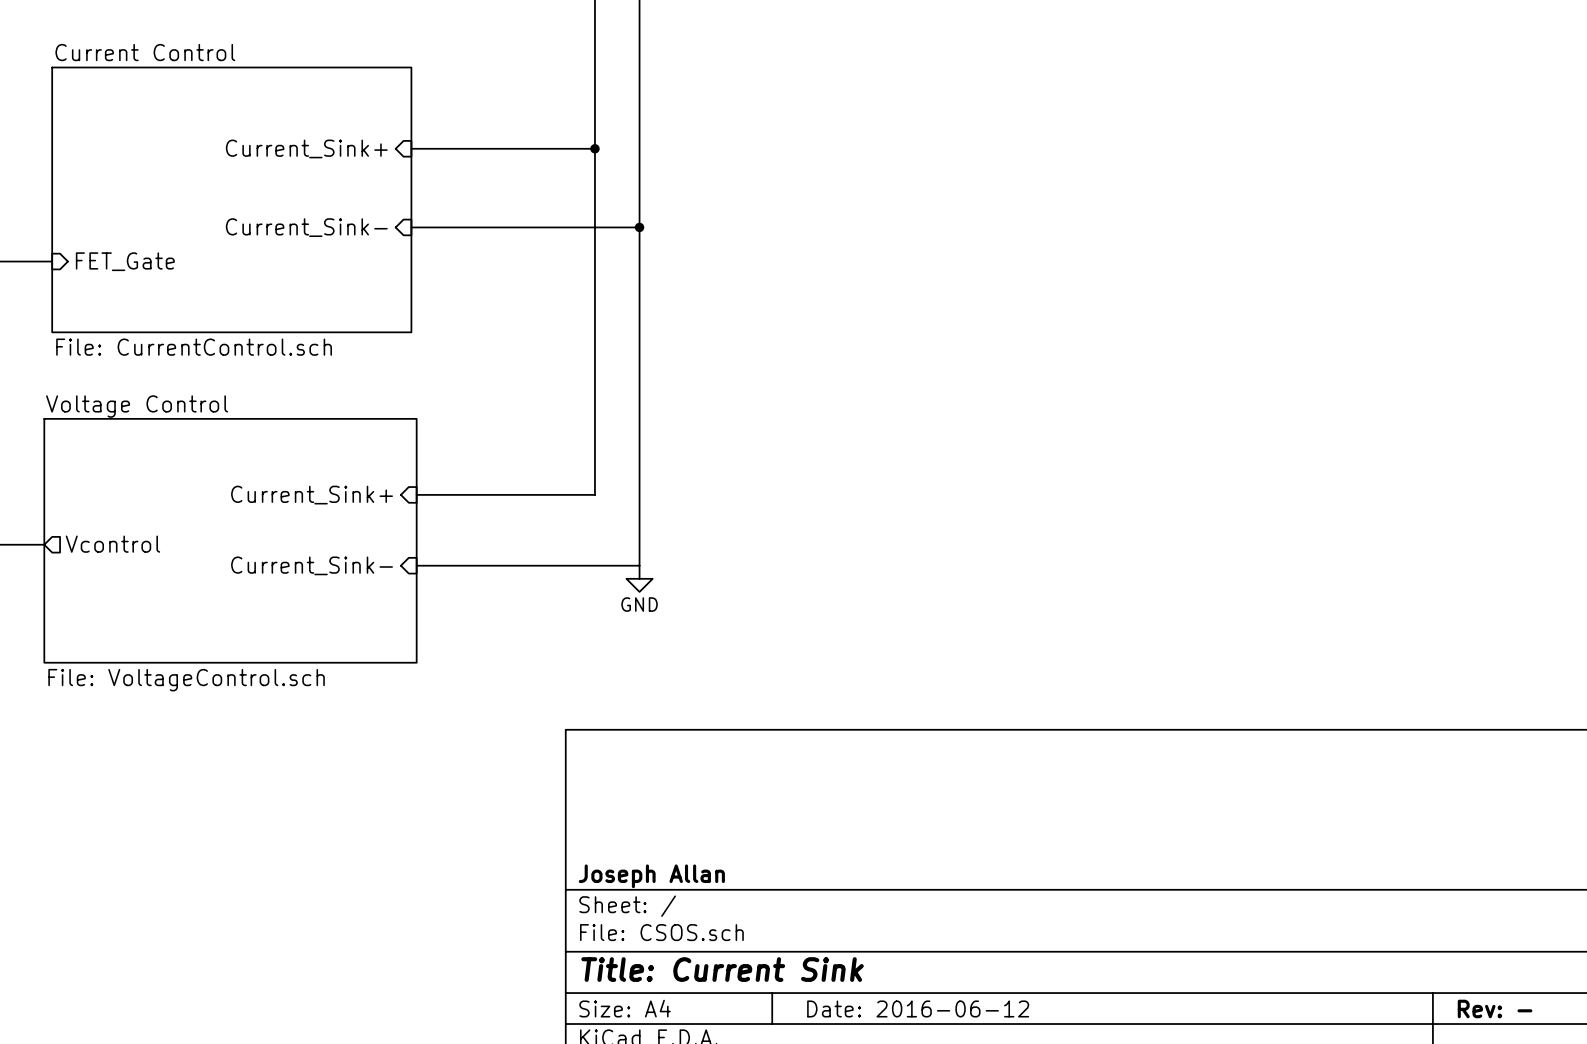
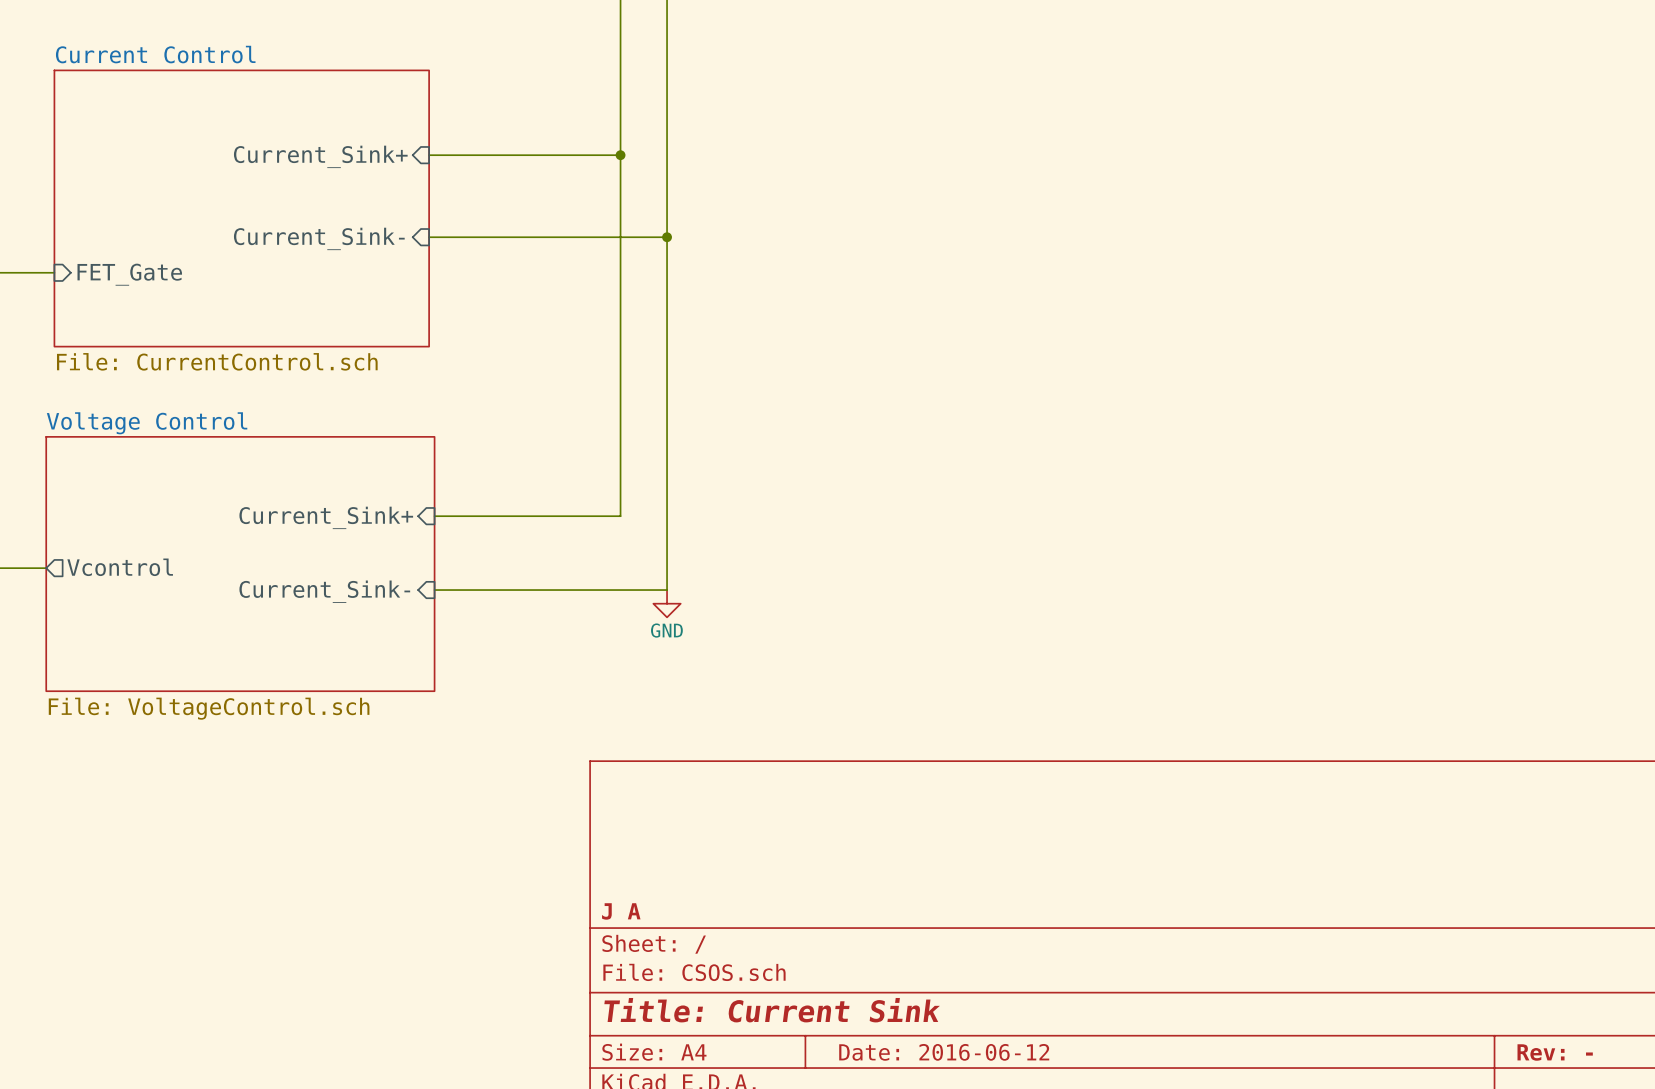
title block: Joseph Allan (651, 876) -> J A (621, 911)

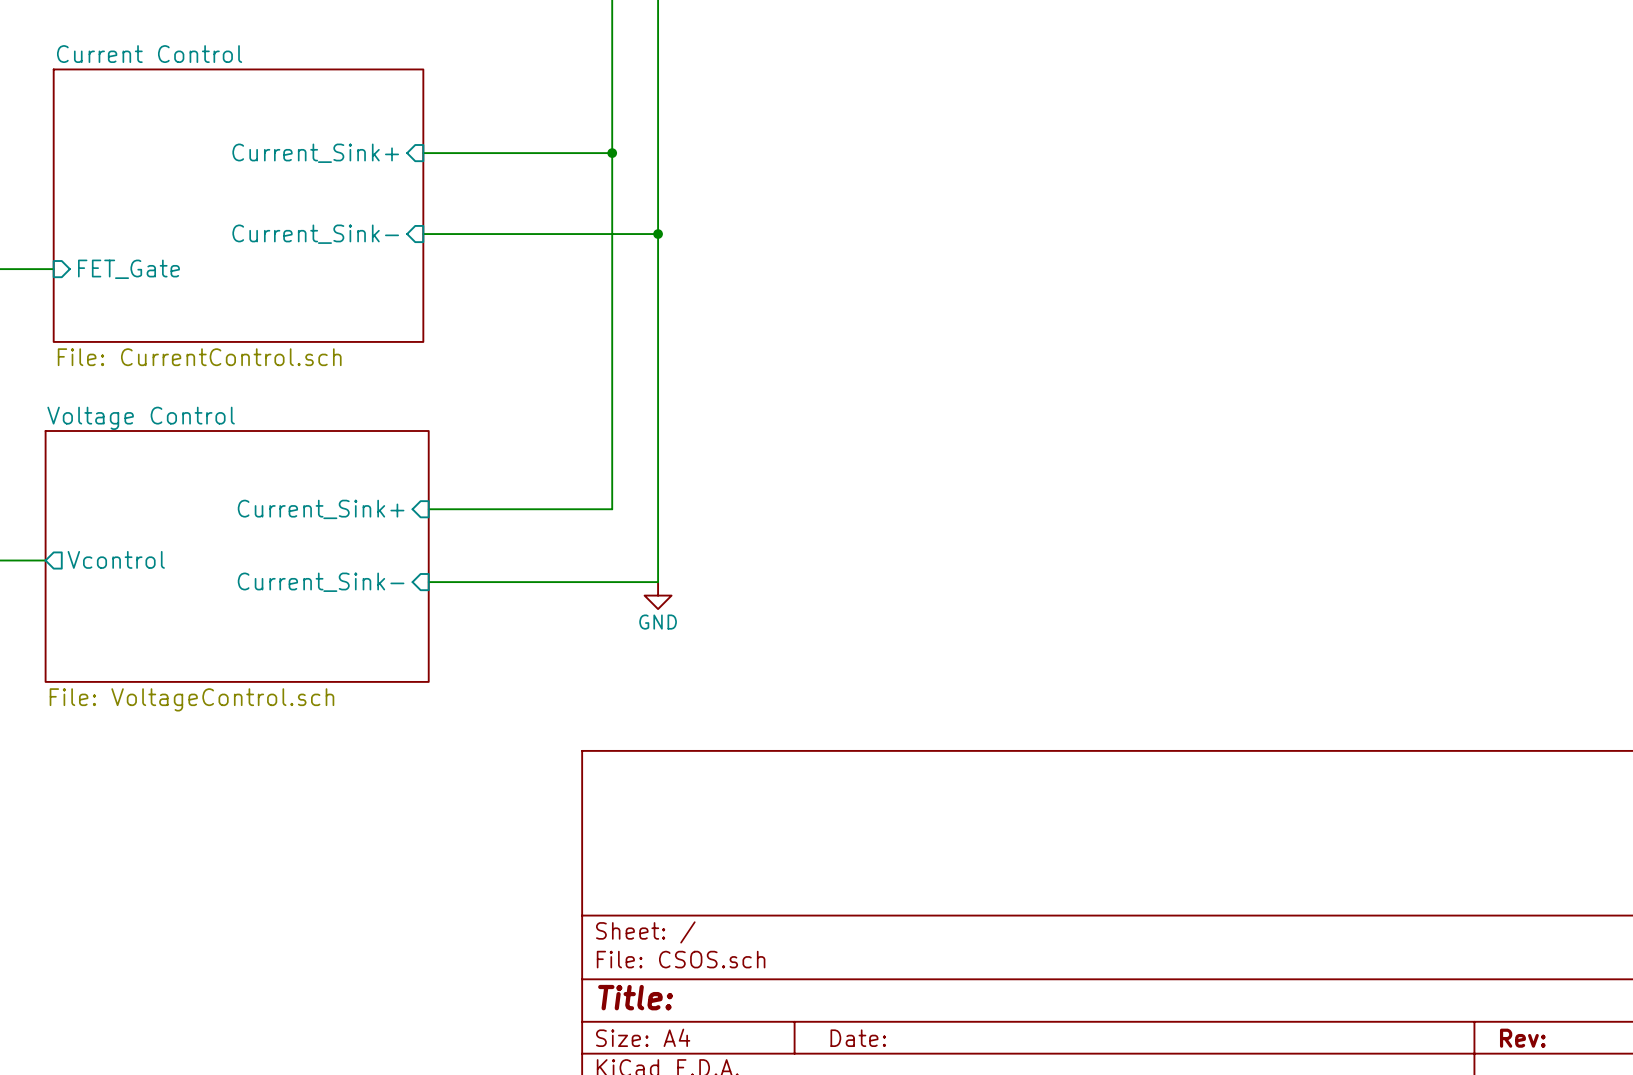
title block: J A (621, 911) -> none
title block: Title: Current Sink (772, 1010) -> Title: (635, 997)
title block: Date: 2016-06-12 (944, 1052) -> Date: (858, 1038)
title block: Rev: - (1555, 1052) -> Rev: (1522, 1038)

